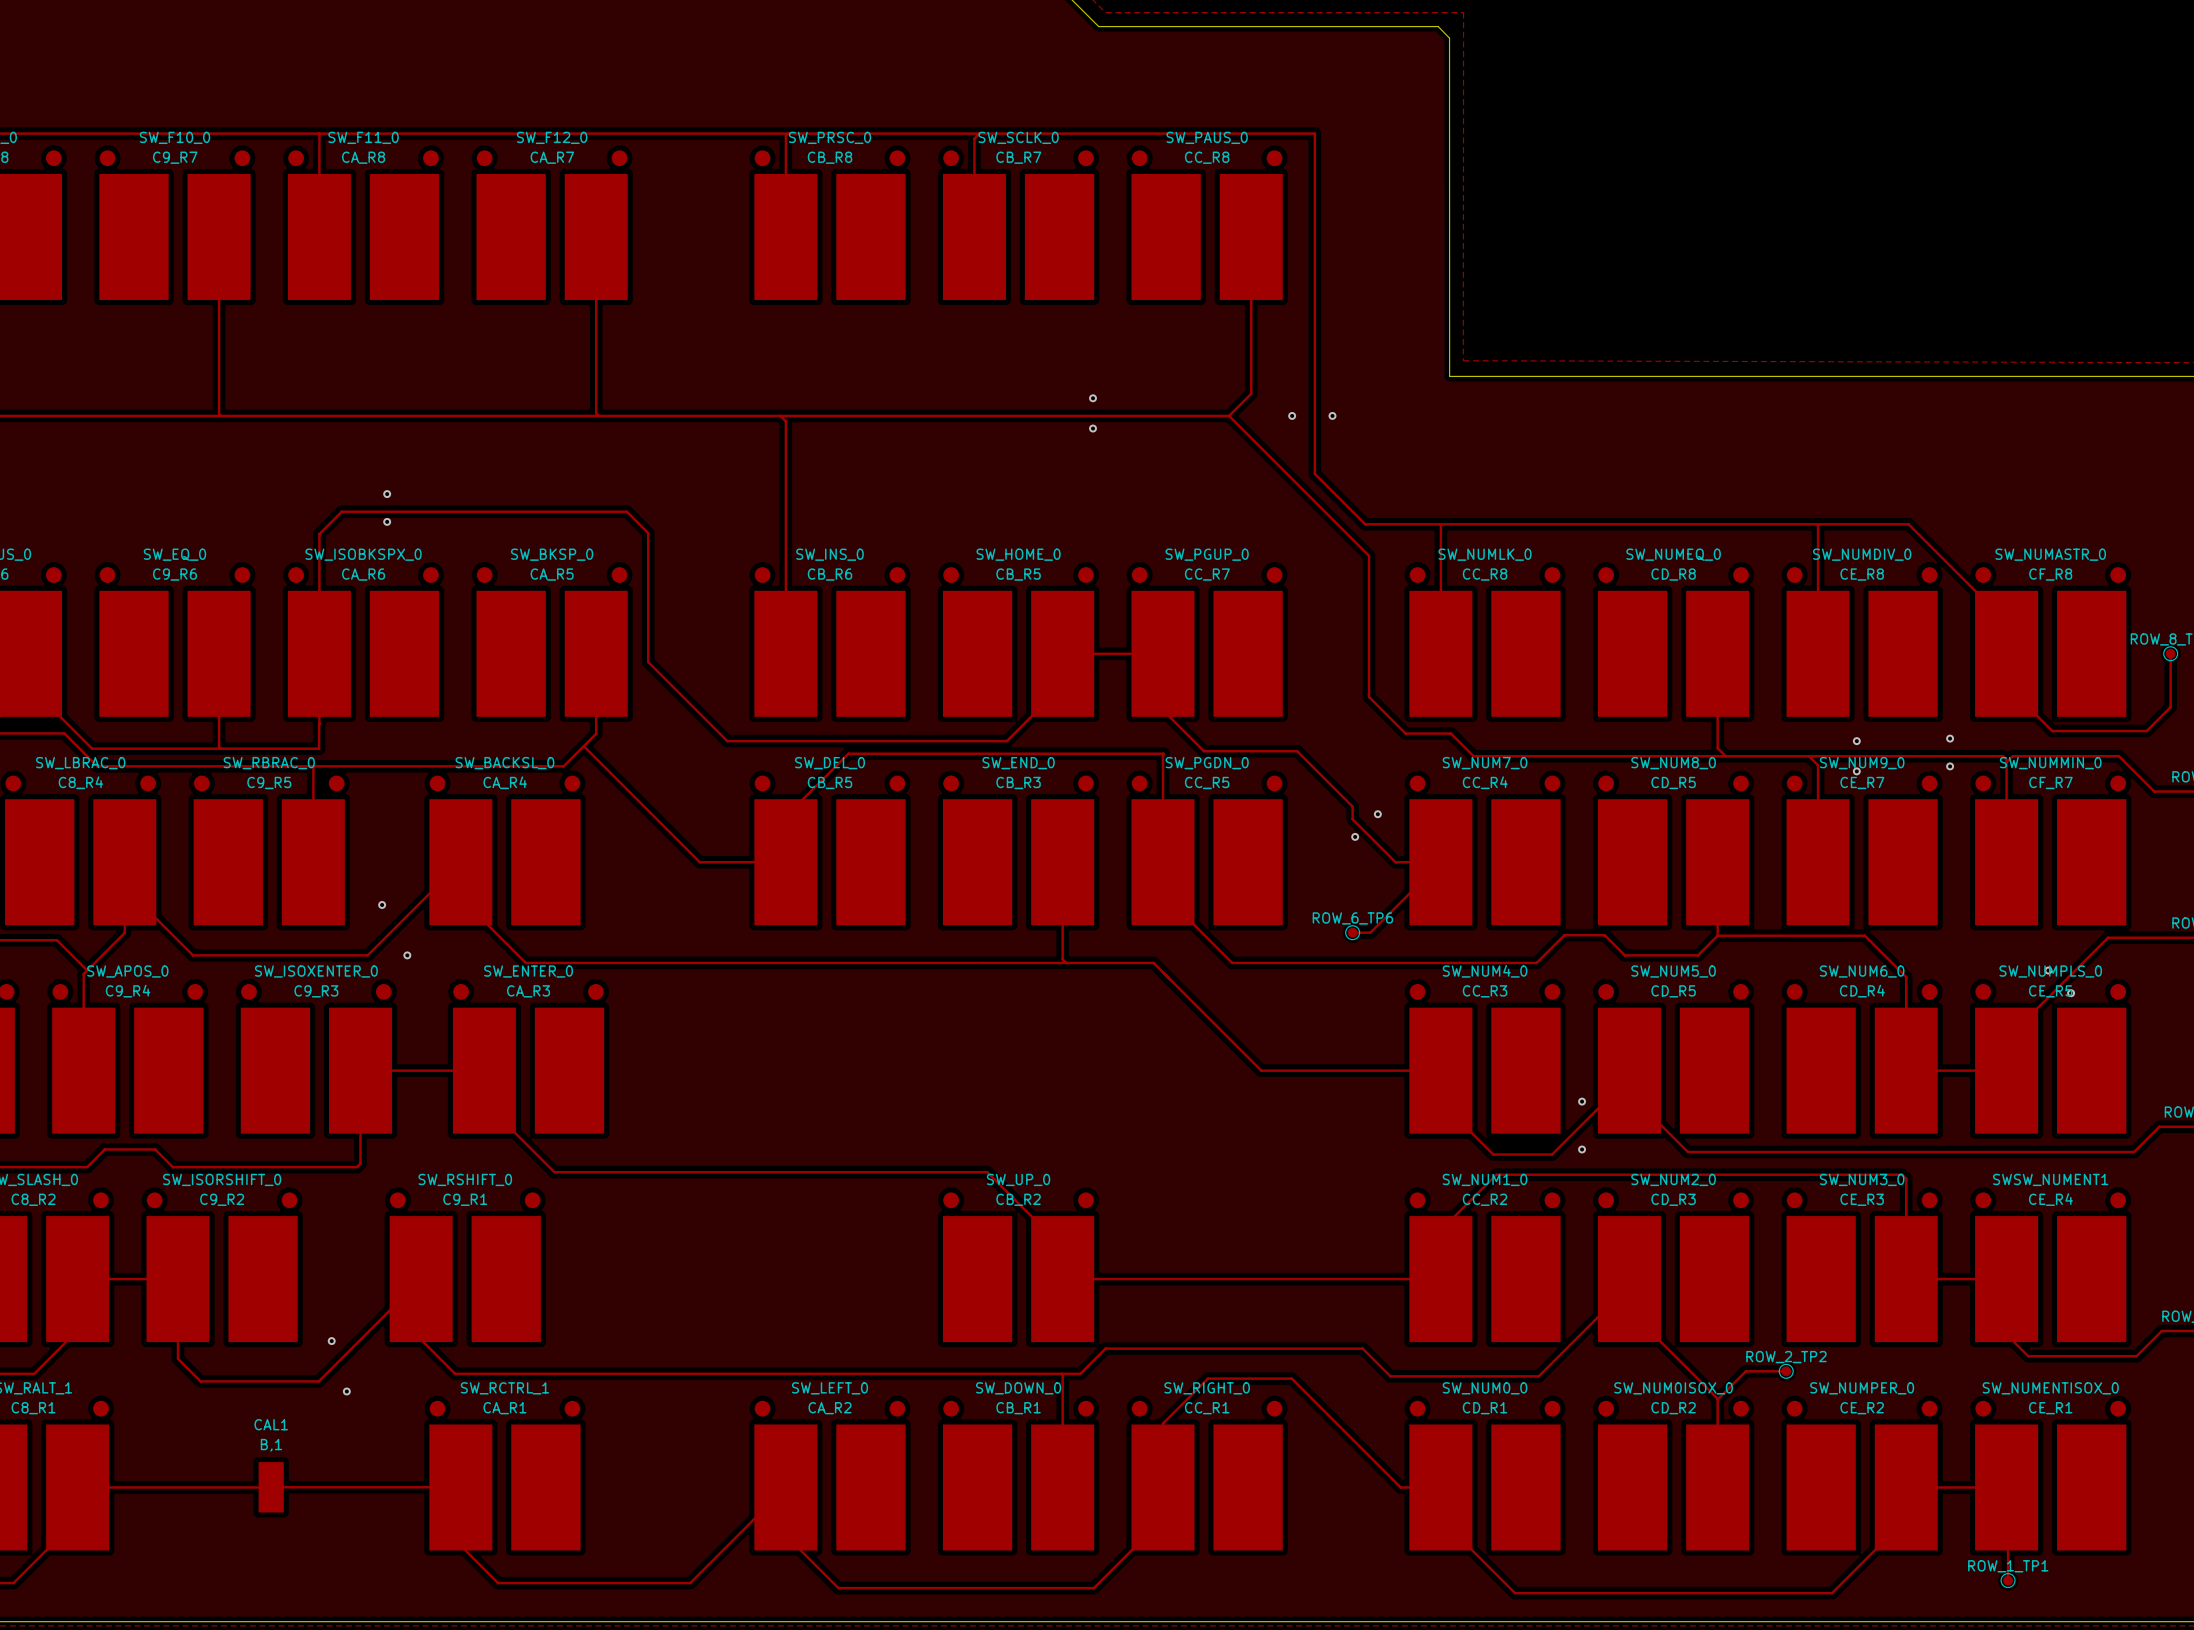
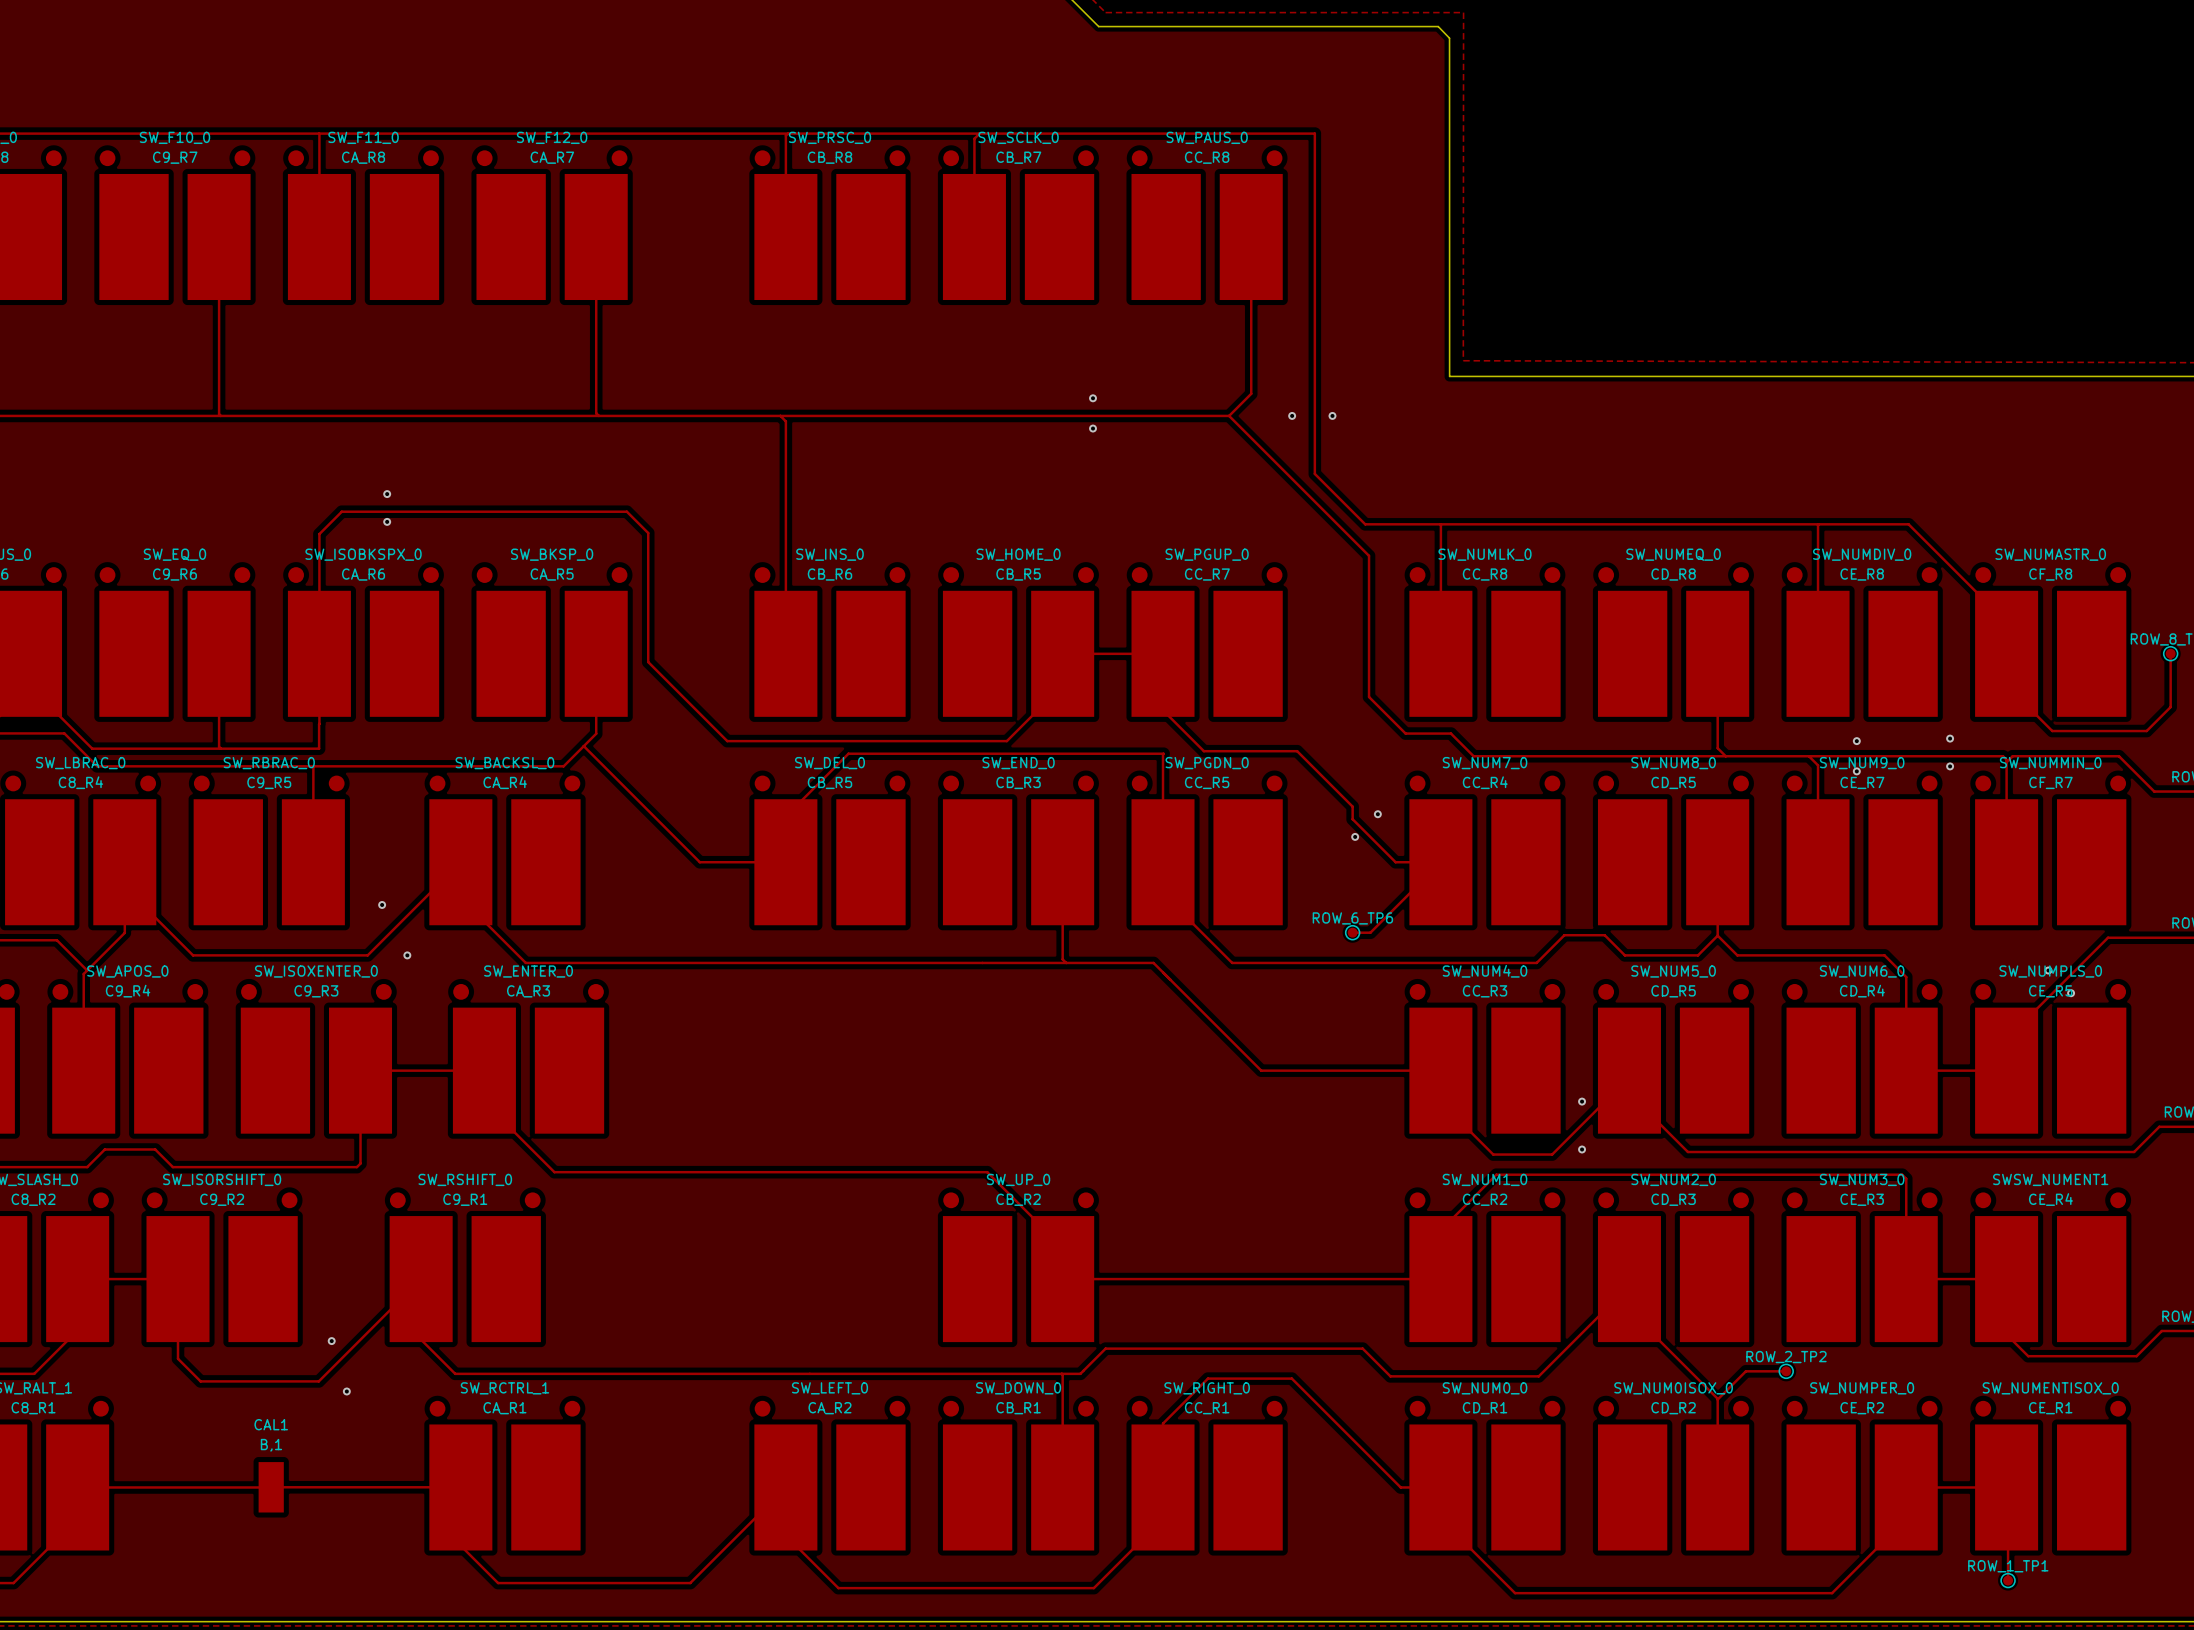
track: (1717, 935) (1864, 935) (1884, 955) -> (1717, 935) (1737, 955) (1884, 955)

